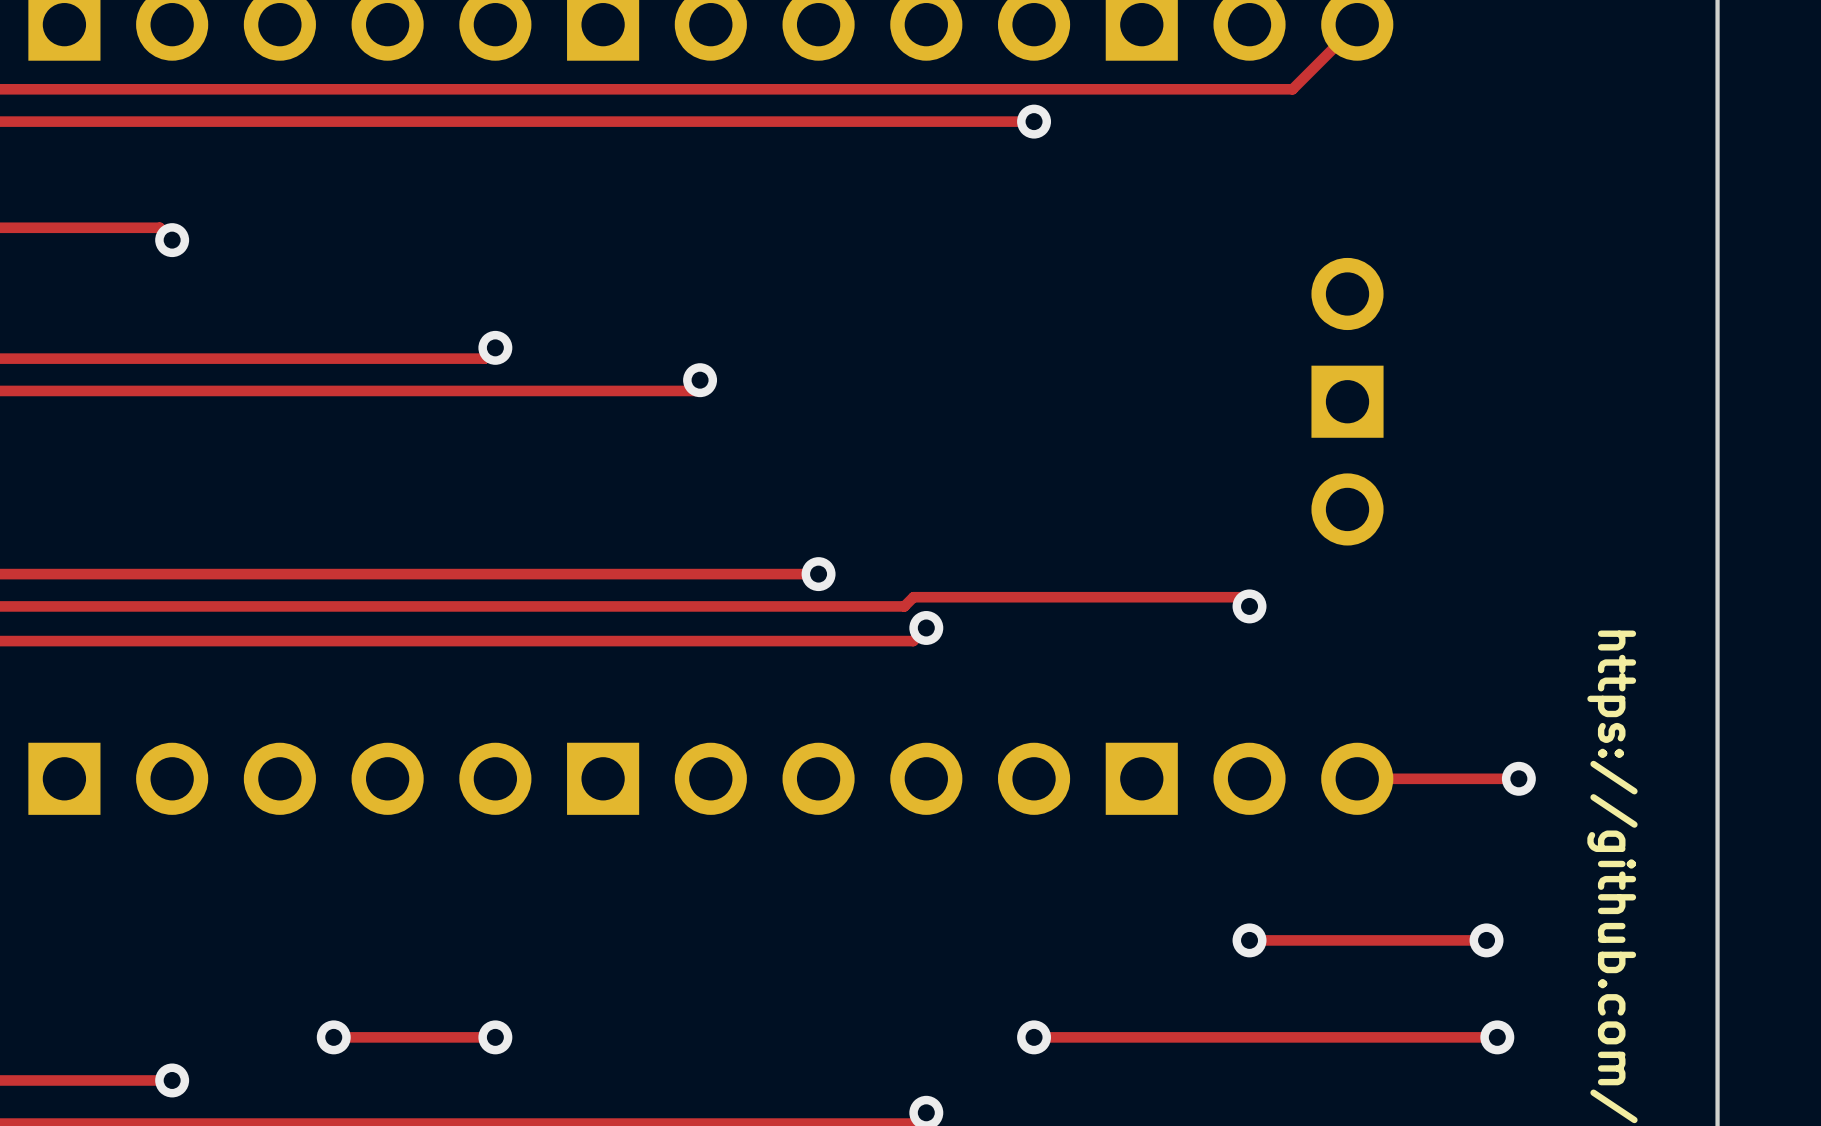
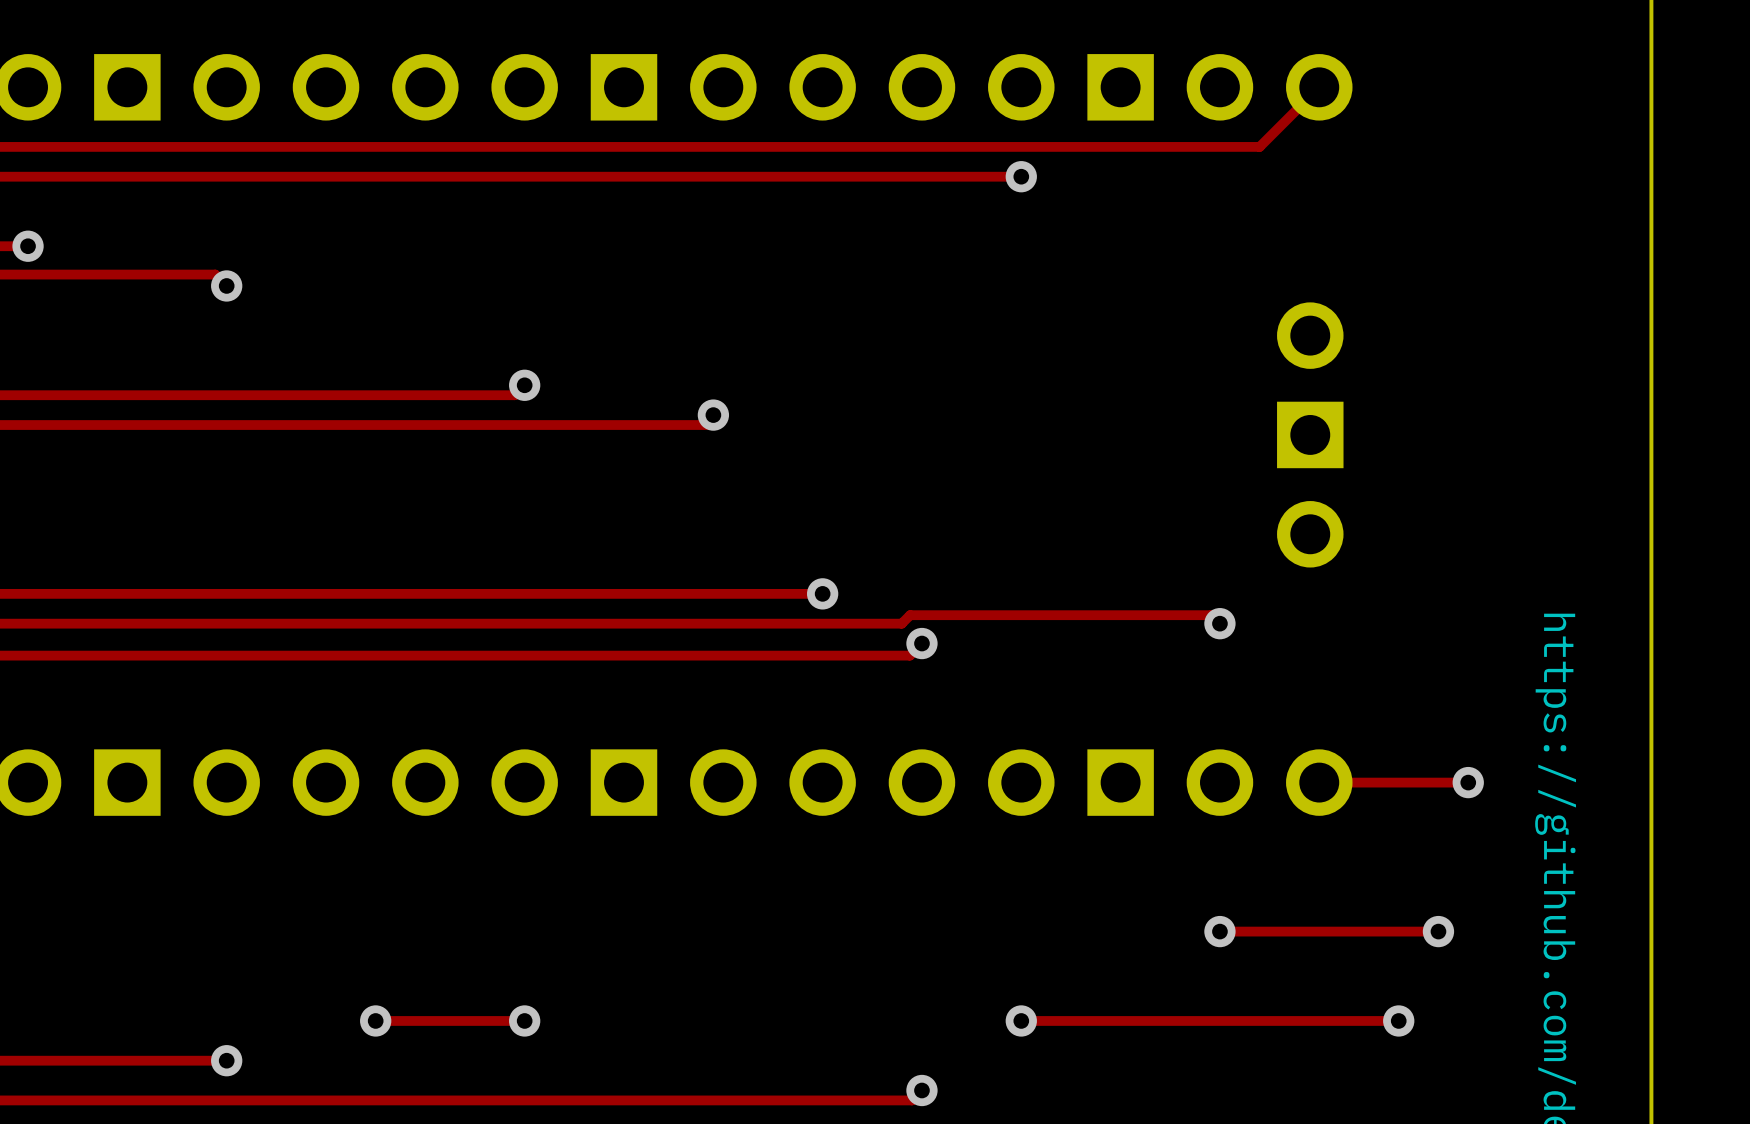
track: (1443, 1037) (1497, 1037) -> none
via position: (1497, 1037) -> (1398, 1020)

